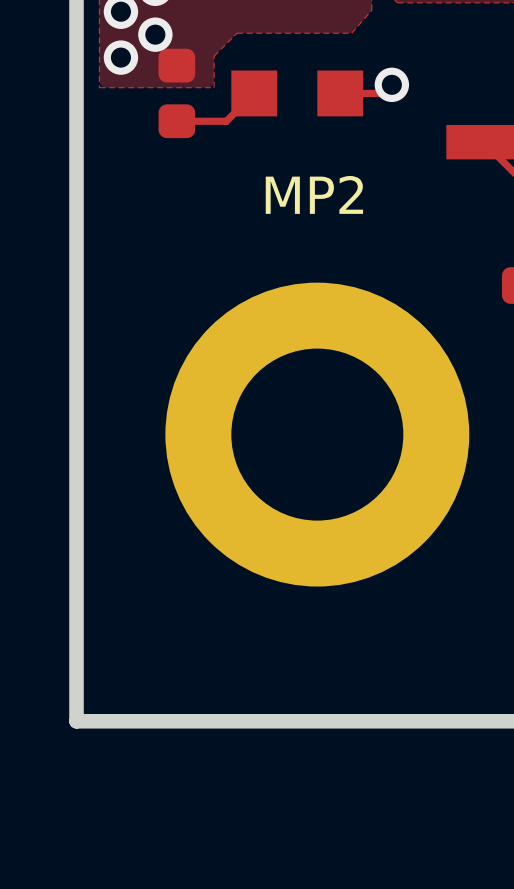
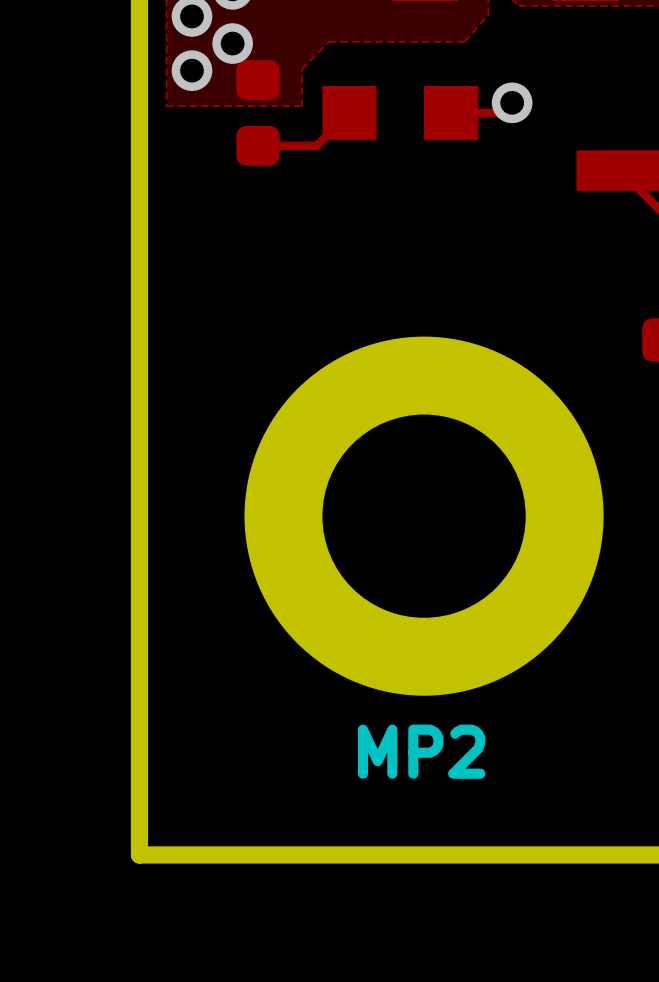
MP2 name position: MP2 (314, 194) -> MP2 (421, 751)

